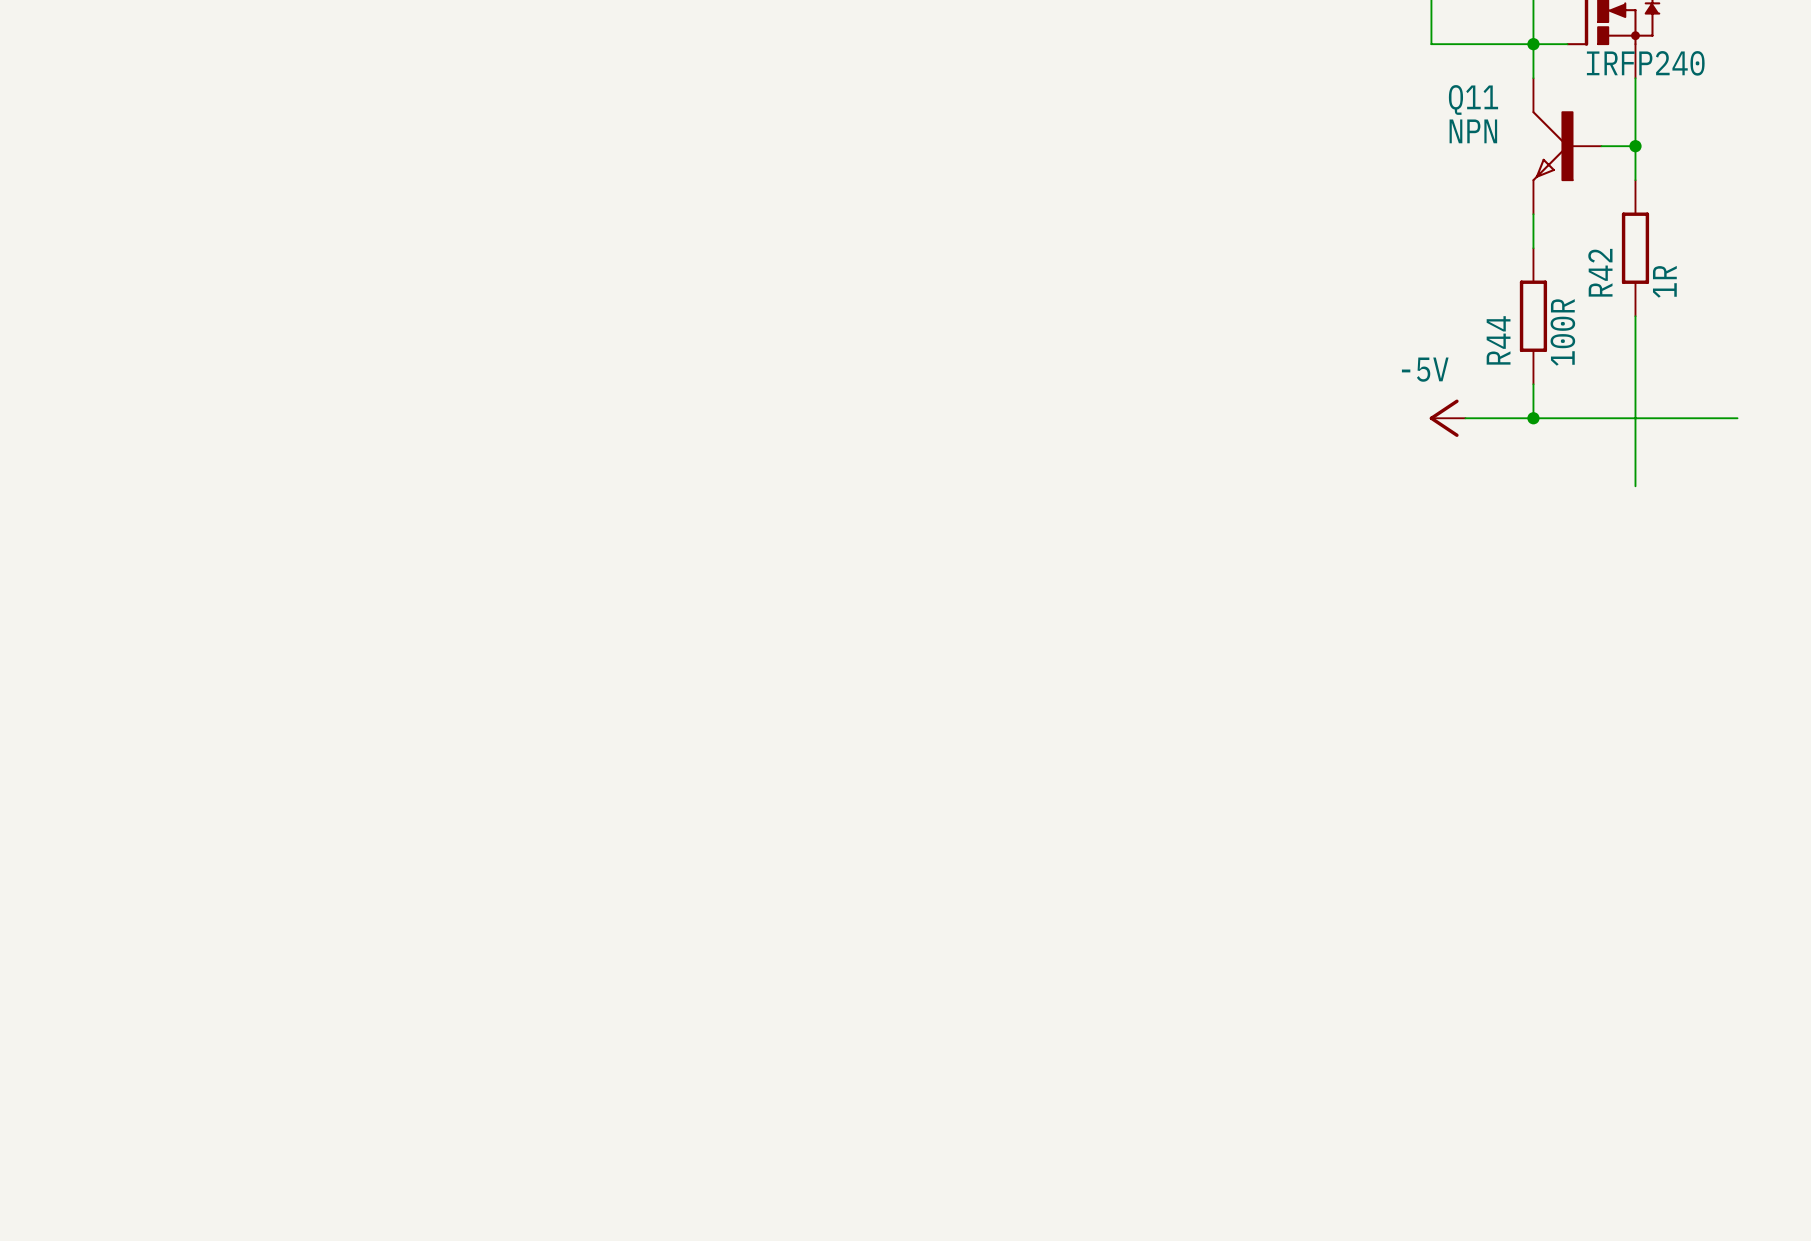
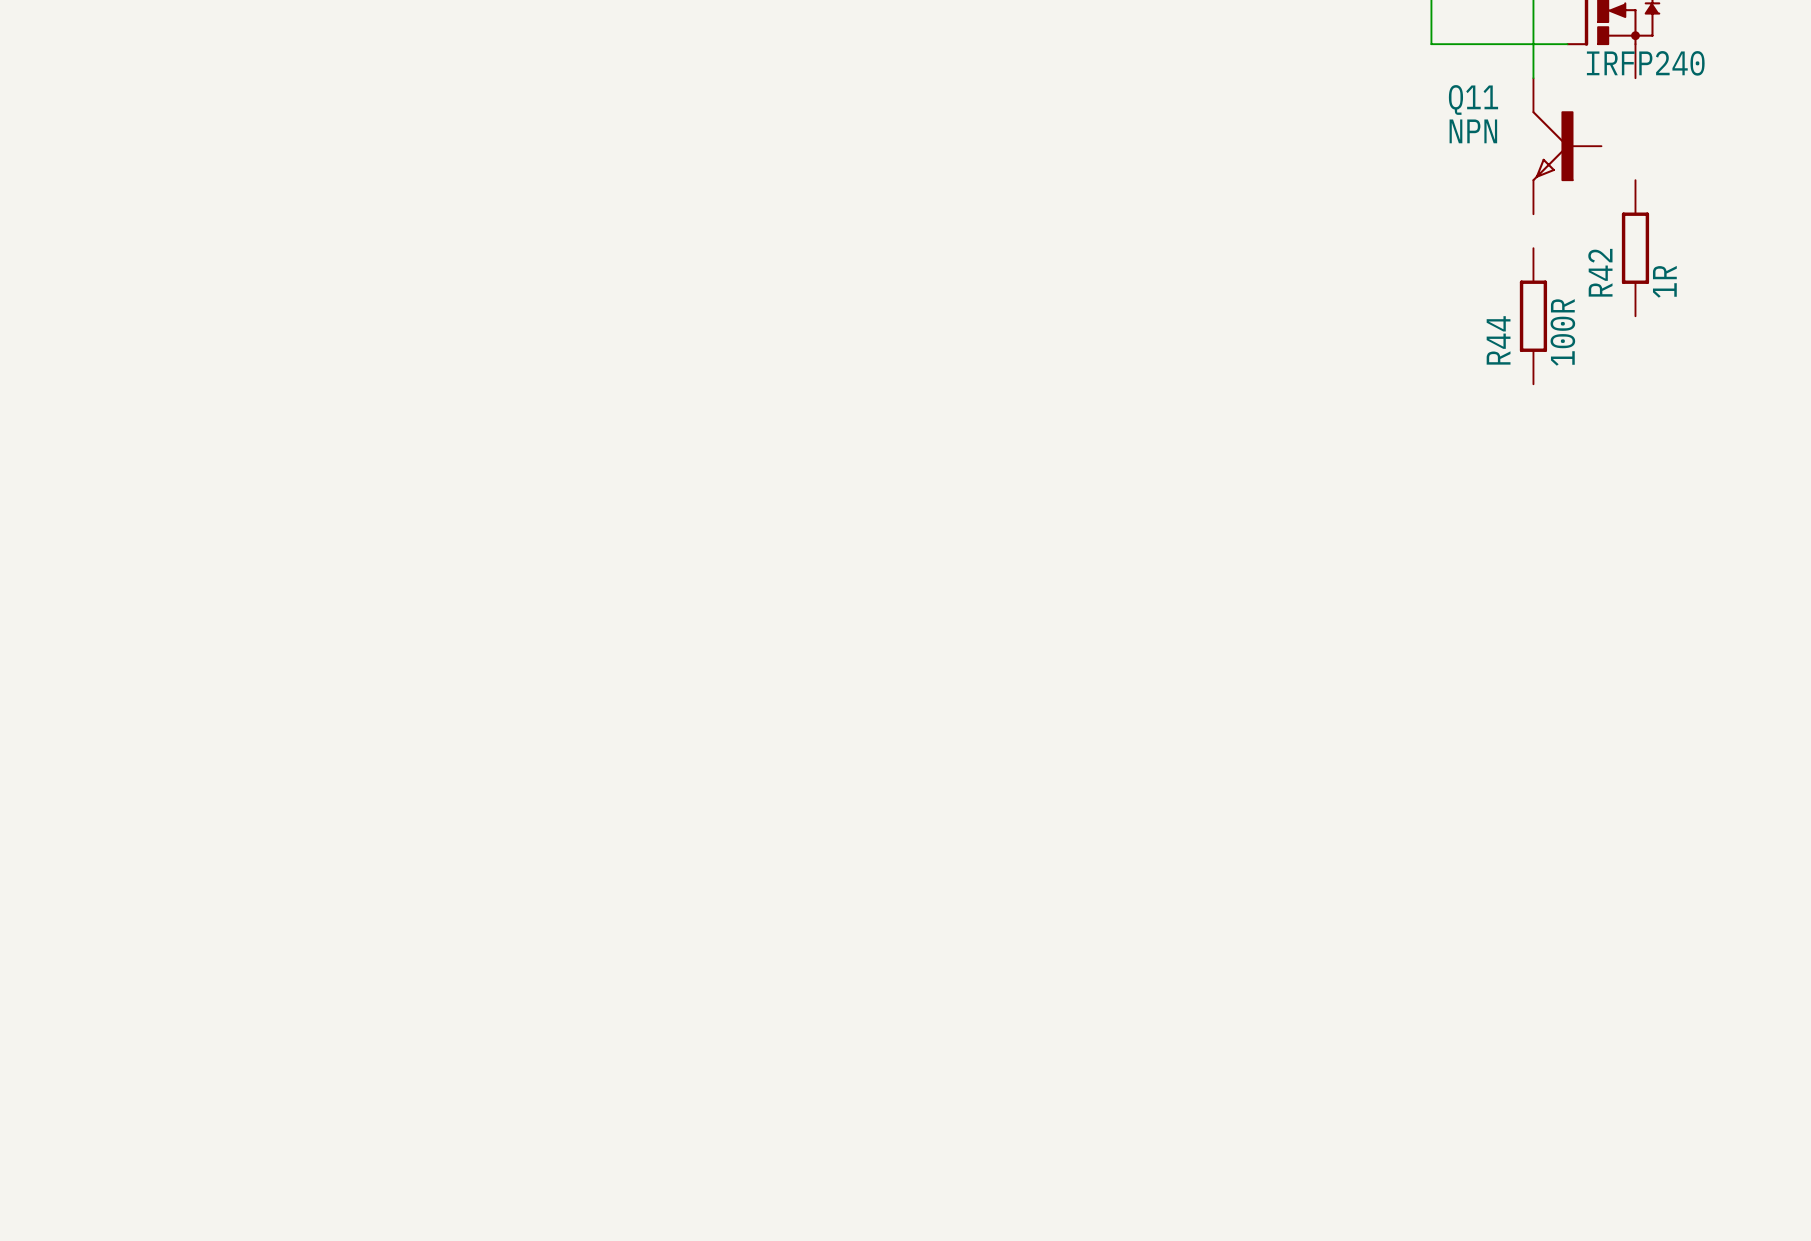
junction: (1533, 44) -> none
wire: (1635, 78) (1635, 180) -> none
wire: (1601, 146) (1635, 146) -> none
junction: (1635, 146) -> none
wire: (1533, 214) (1533, 248) -> none
wire: (1635, 316) (1635, 486) -> none
wire: (1533, 384) (1533, 418) -> none
power symbol: -5V (1447, 418) -> none
wire: (1465, 418) (1737, 418) -> none
junction: (1533, 418) -> none

